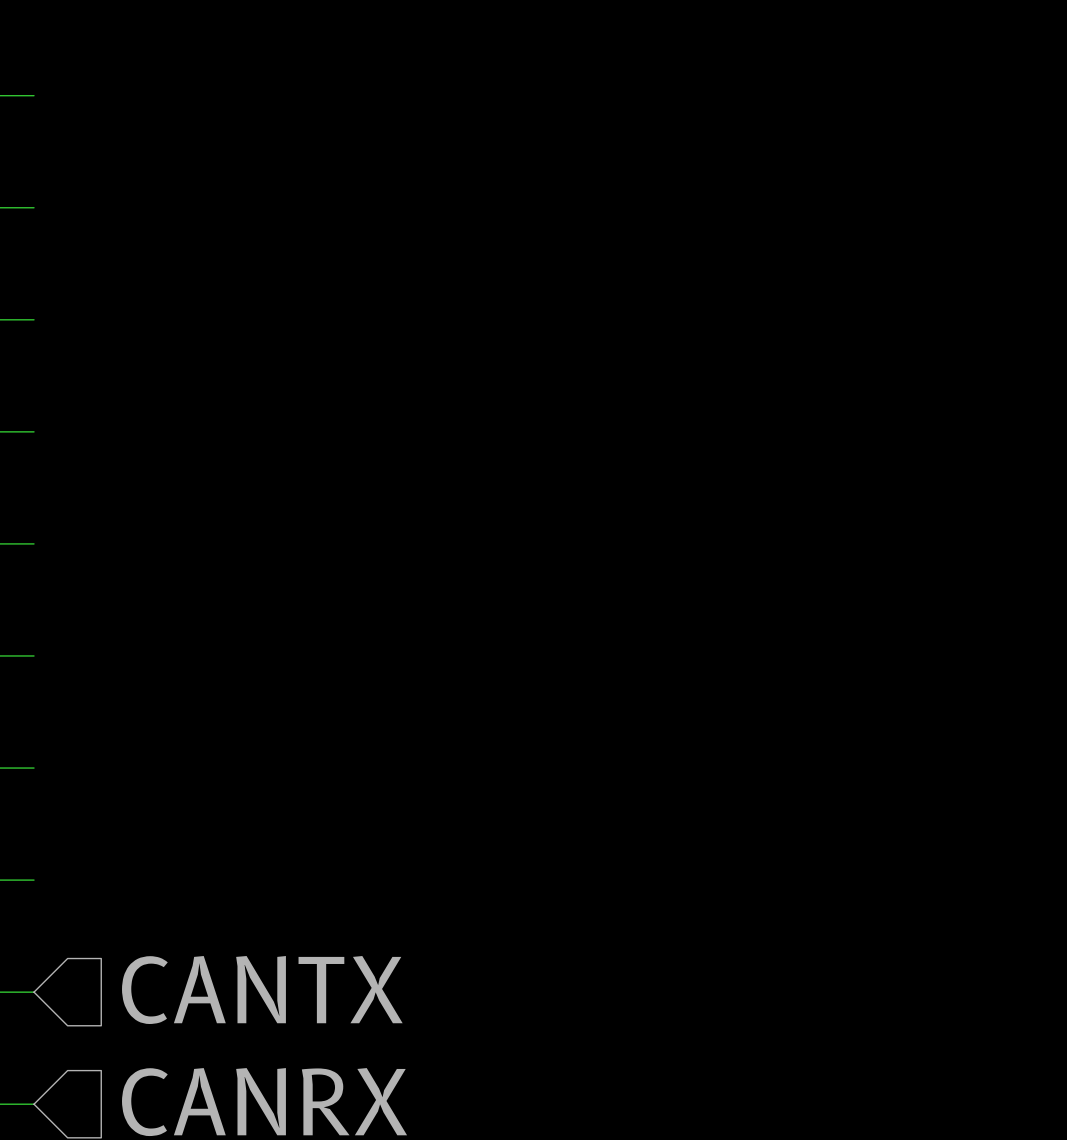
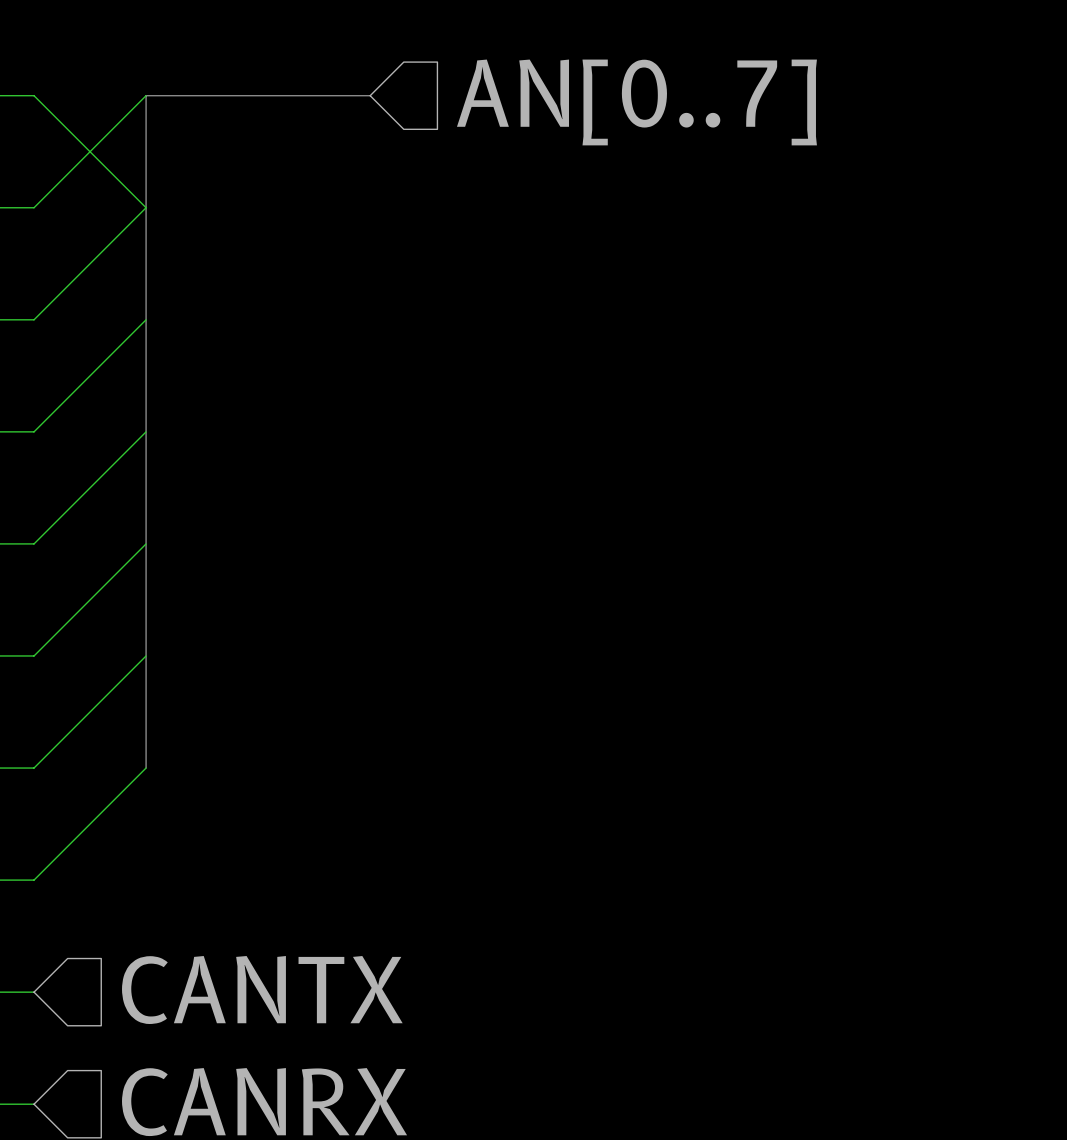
wire: none -> (34, 95) (146, 207) (34, 319)
wire: none -> (146, 95) (34, 207)
bus: none -> (370, 95) (146, 95) (146, 768)
hierarchical label: none -> AN[0..7] (636, 102)
wire: none -> (146, 319) (34, 431)
wire: none -> (146, 431) (34, 543)
wire: none -> (146, 543) (34, 655)
wire: none -> (146, 655) (34, 768)
wire: none -> (146, 768) (34, 880)

